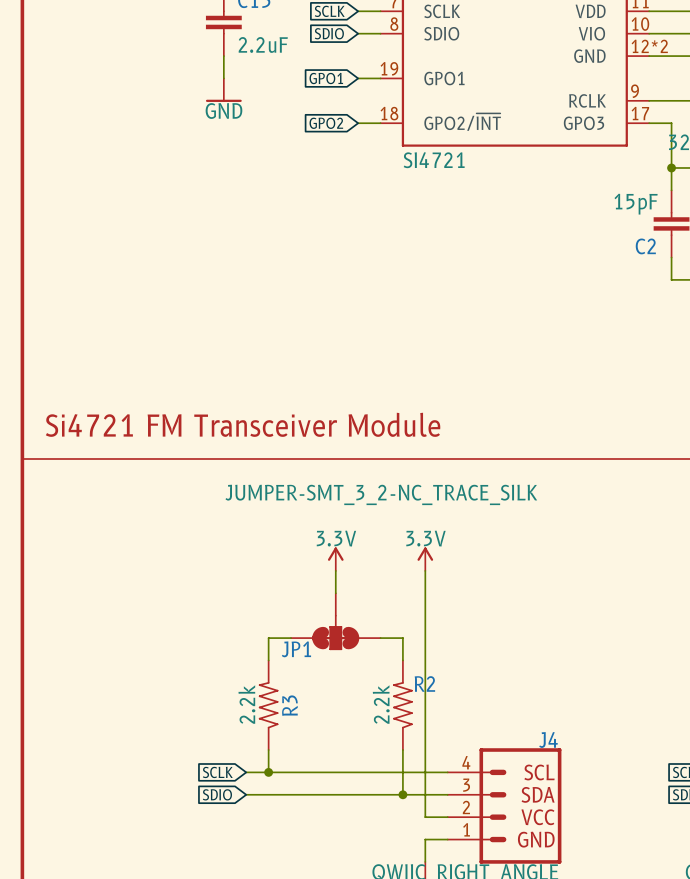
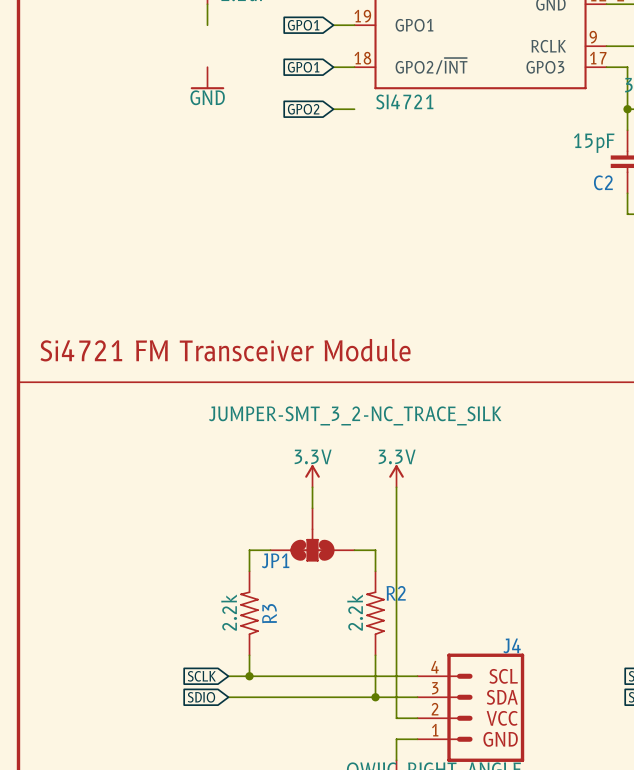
power symbol position: GND (223, 90) -> GND (207, 78)
global label: GPO2 (326, 123) -> GPO1 (303, 67)
wire: none -> (333, 109) (354, 109)
global label: none -> GPO2 (303, 109)

